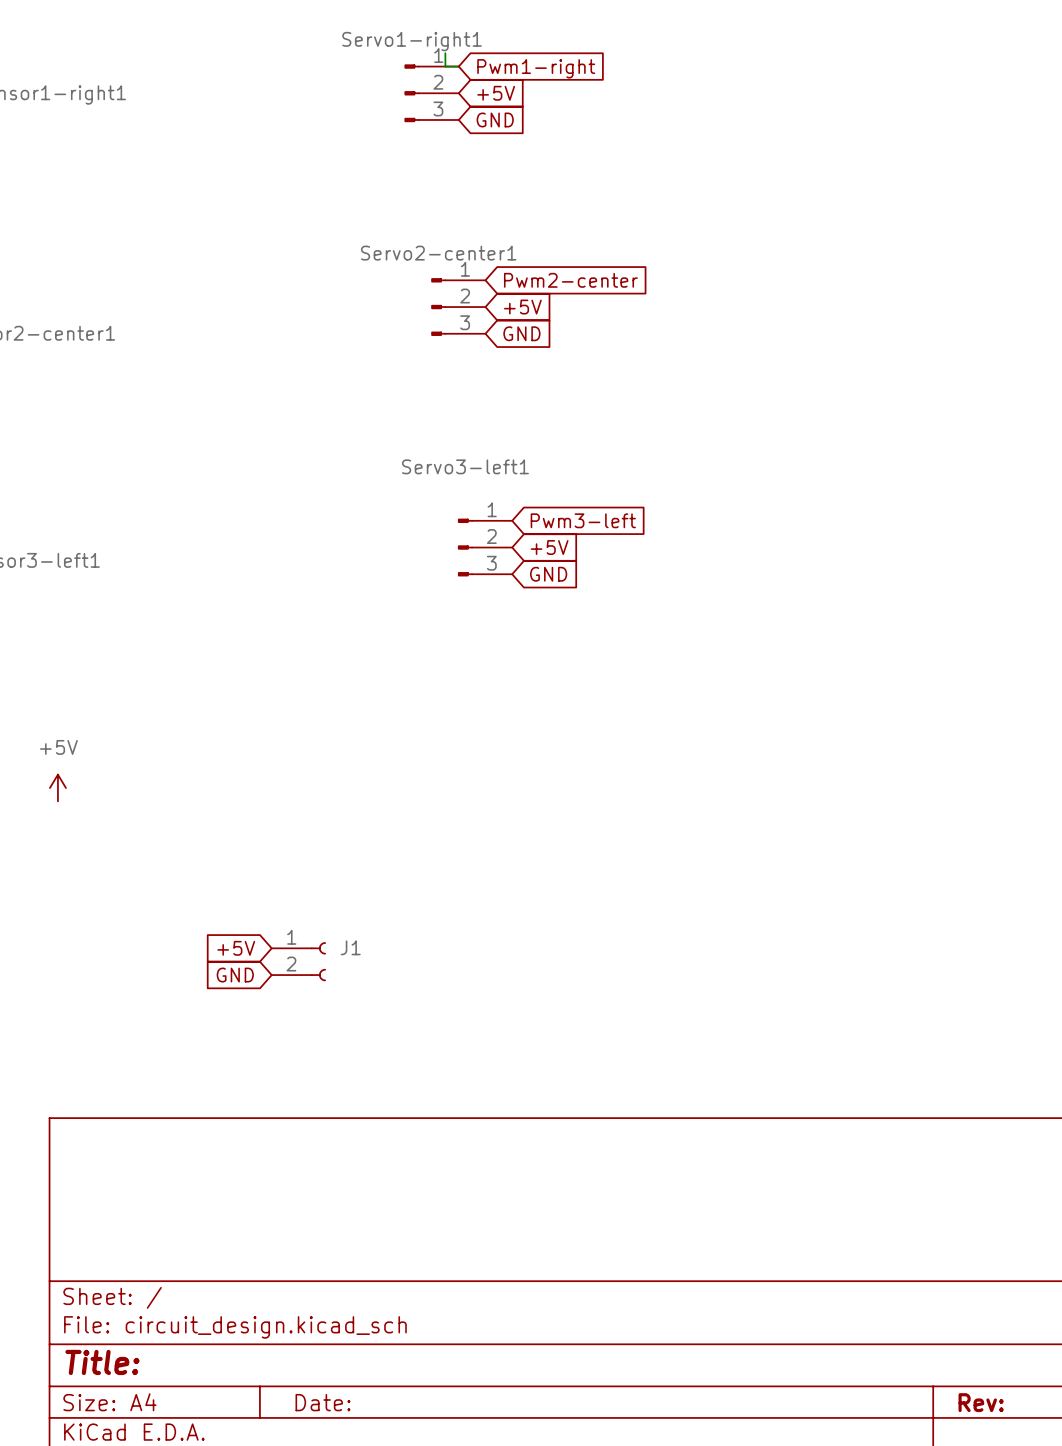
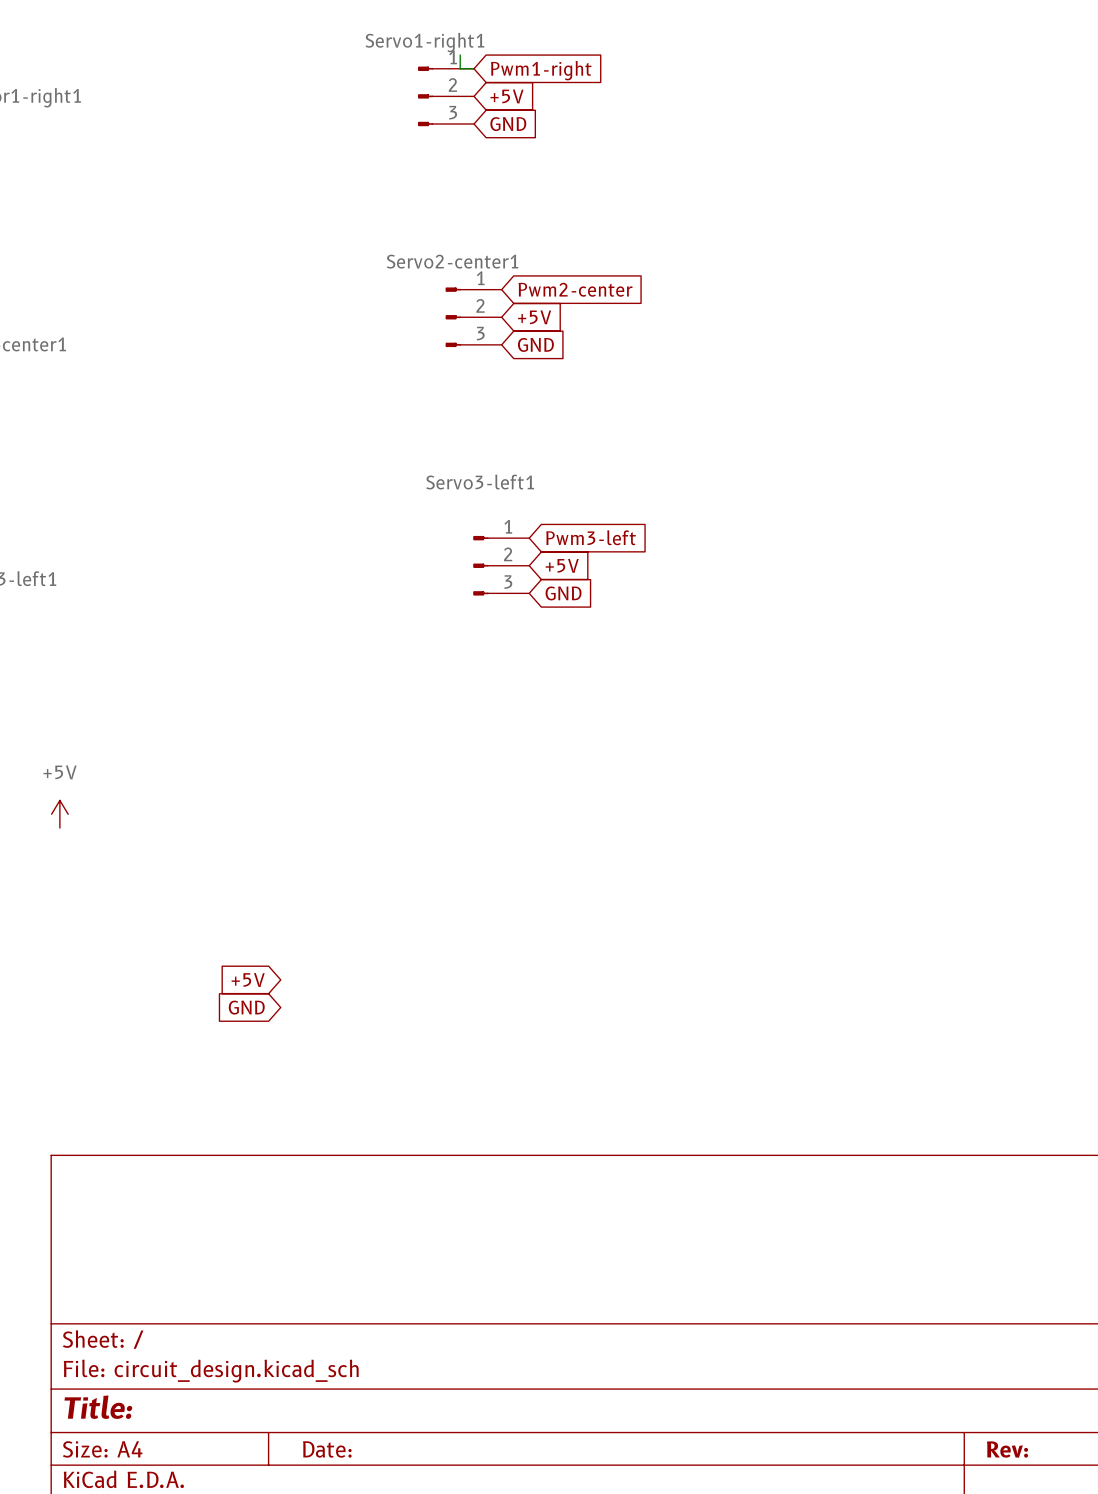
J1: (298, 961) -> none

